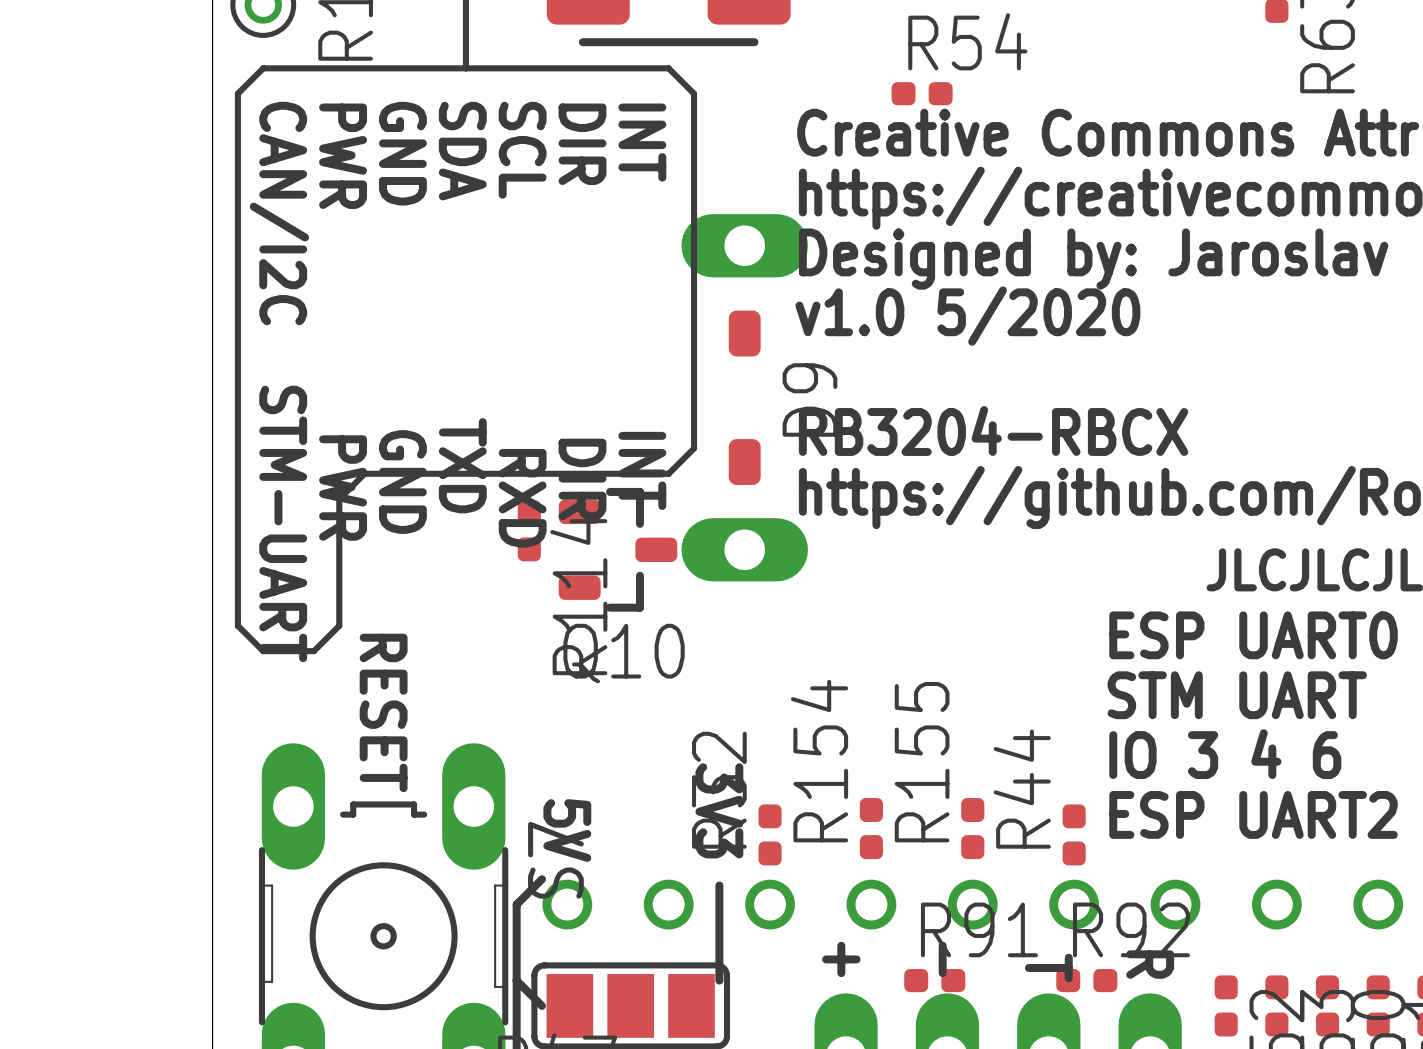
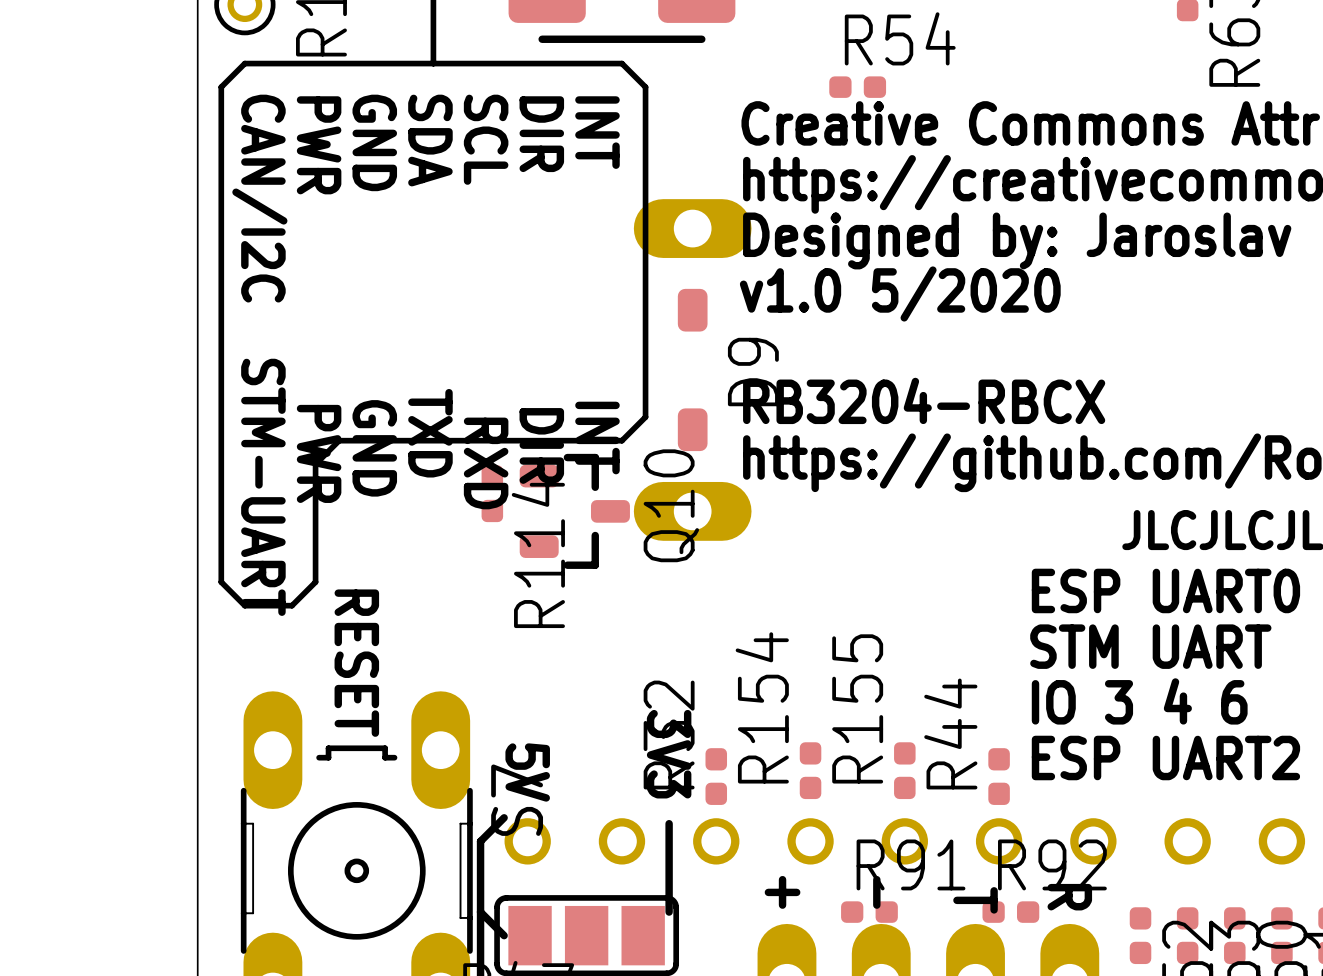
Q10 name rotation: 0° (624, 653) -> 90° counterclockwise (671, 505)

